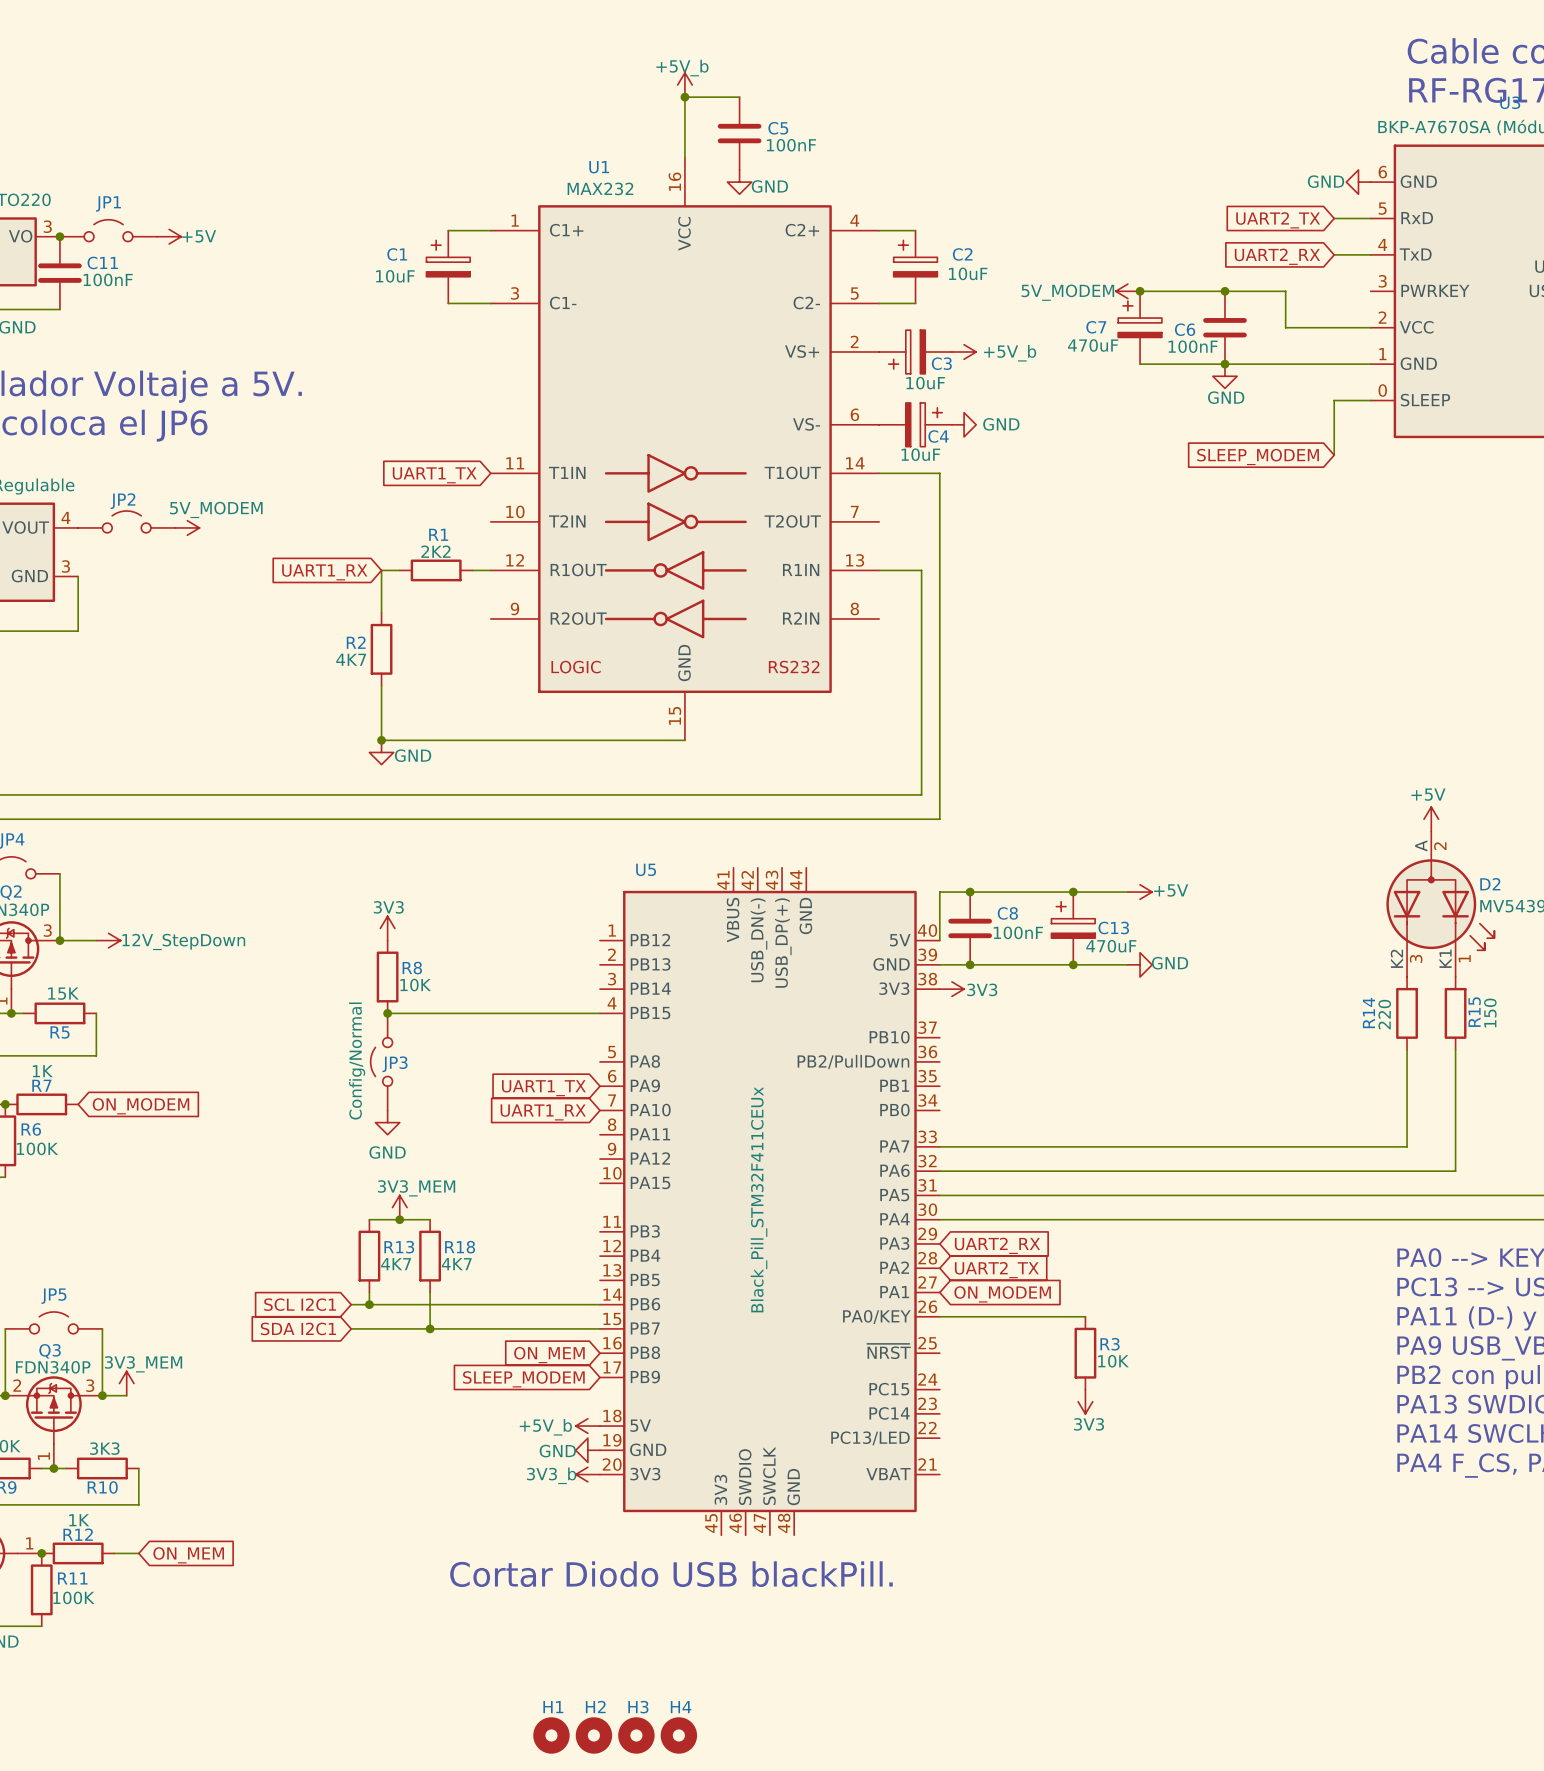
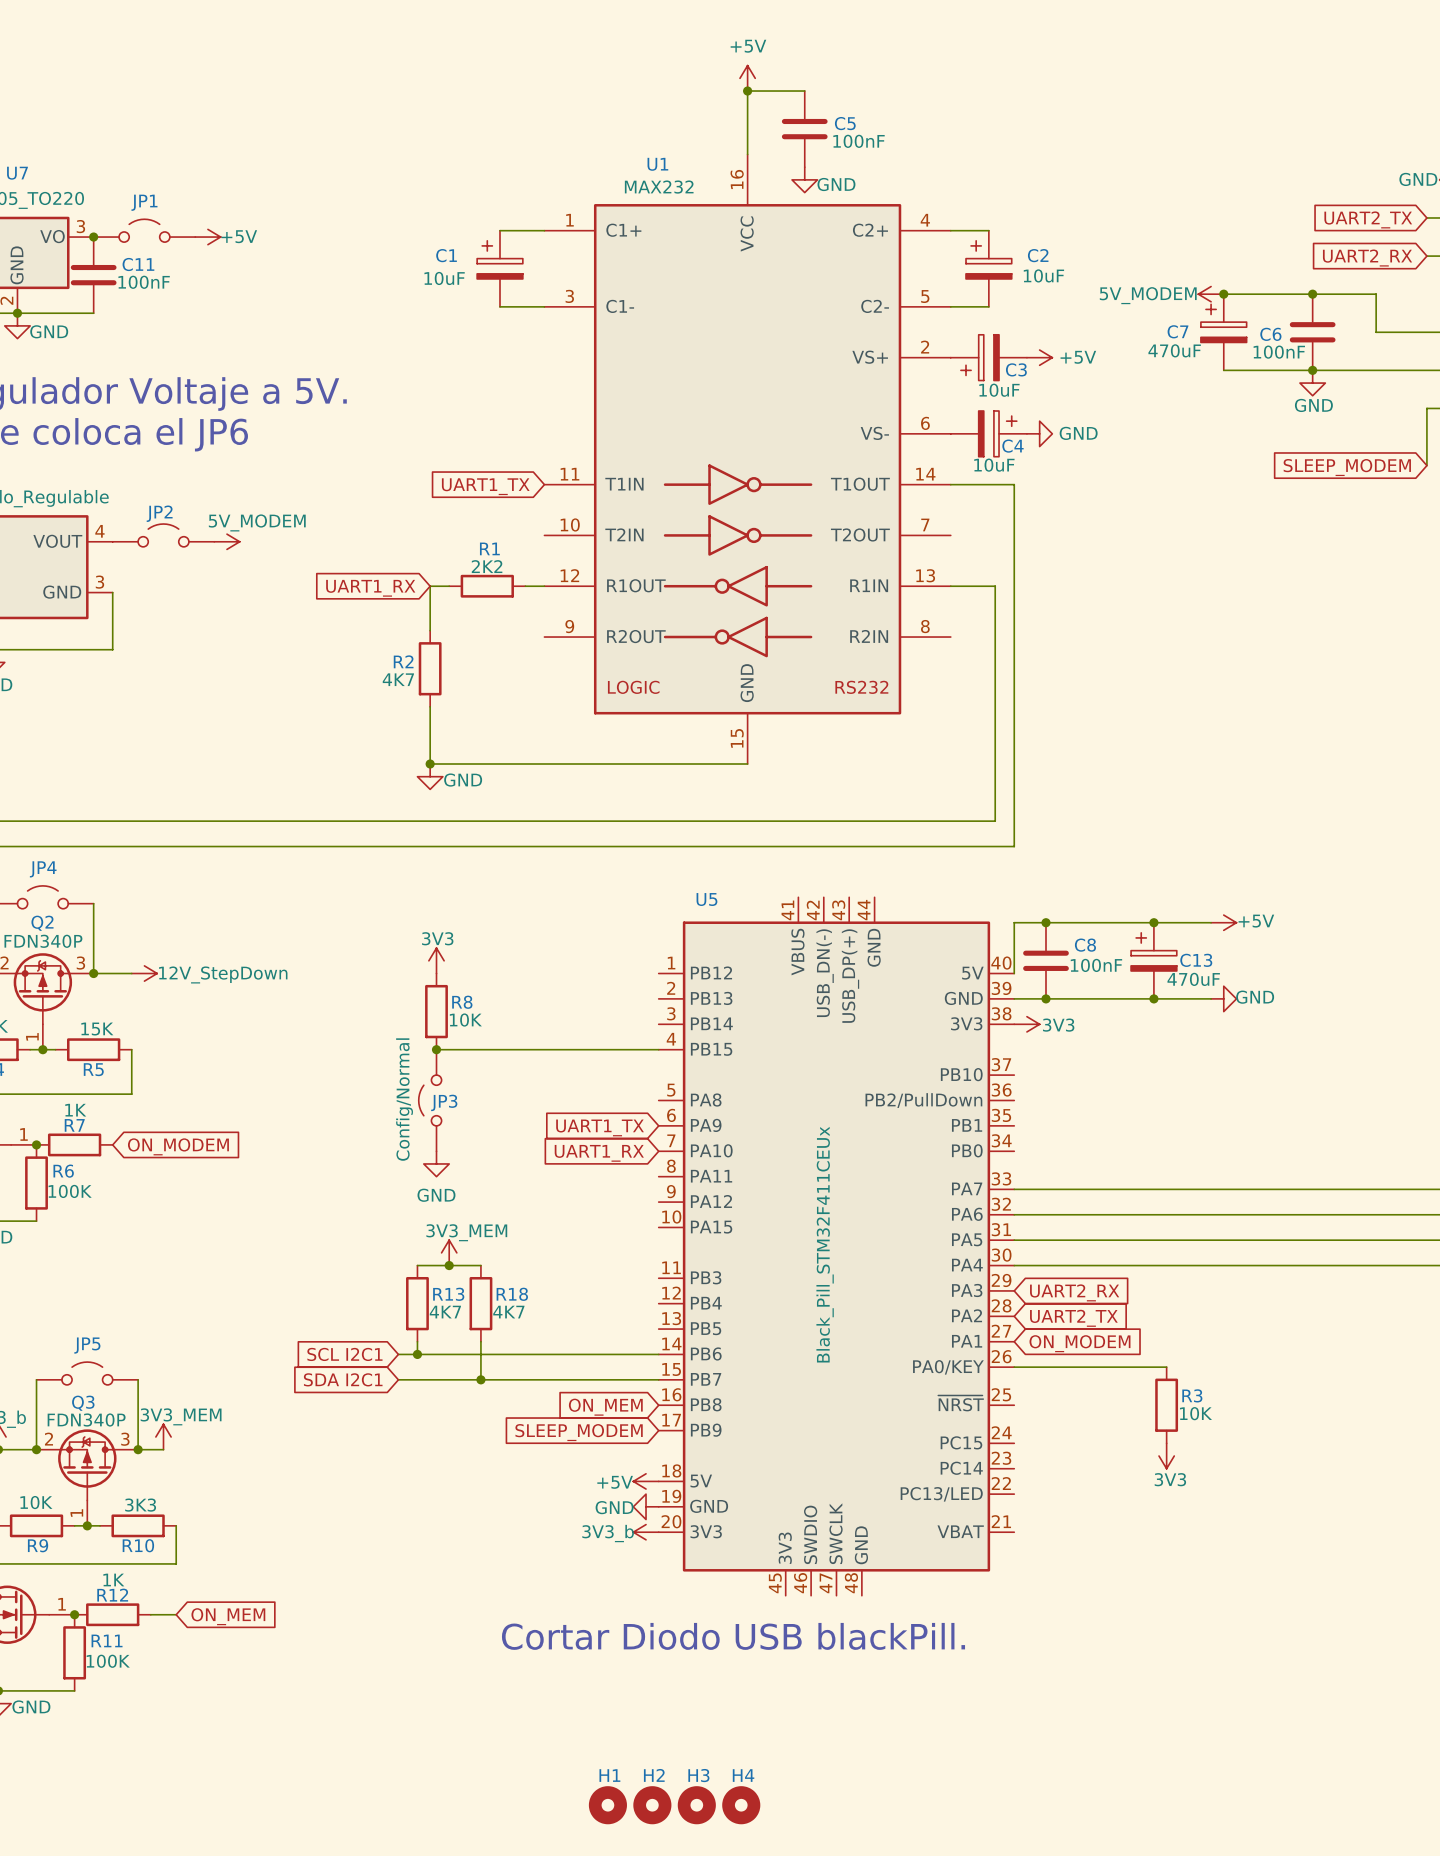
power symbol: +5V_b (684, 85) -> +5V (747, 78)
power symbol: +5V_b (964, 351) -> +5V (1039, 357)
power symbol: +5V_b (587, 1426) -> +5V (646, 1481)

